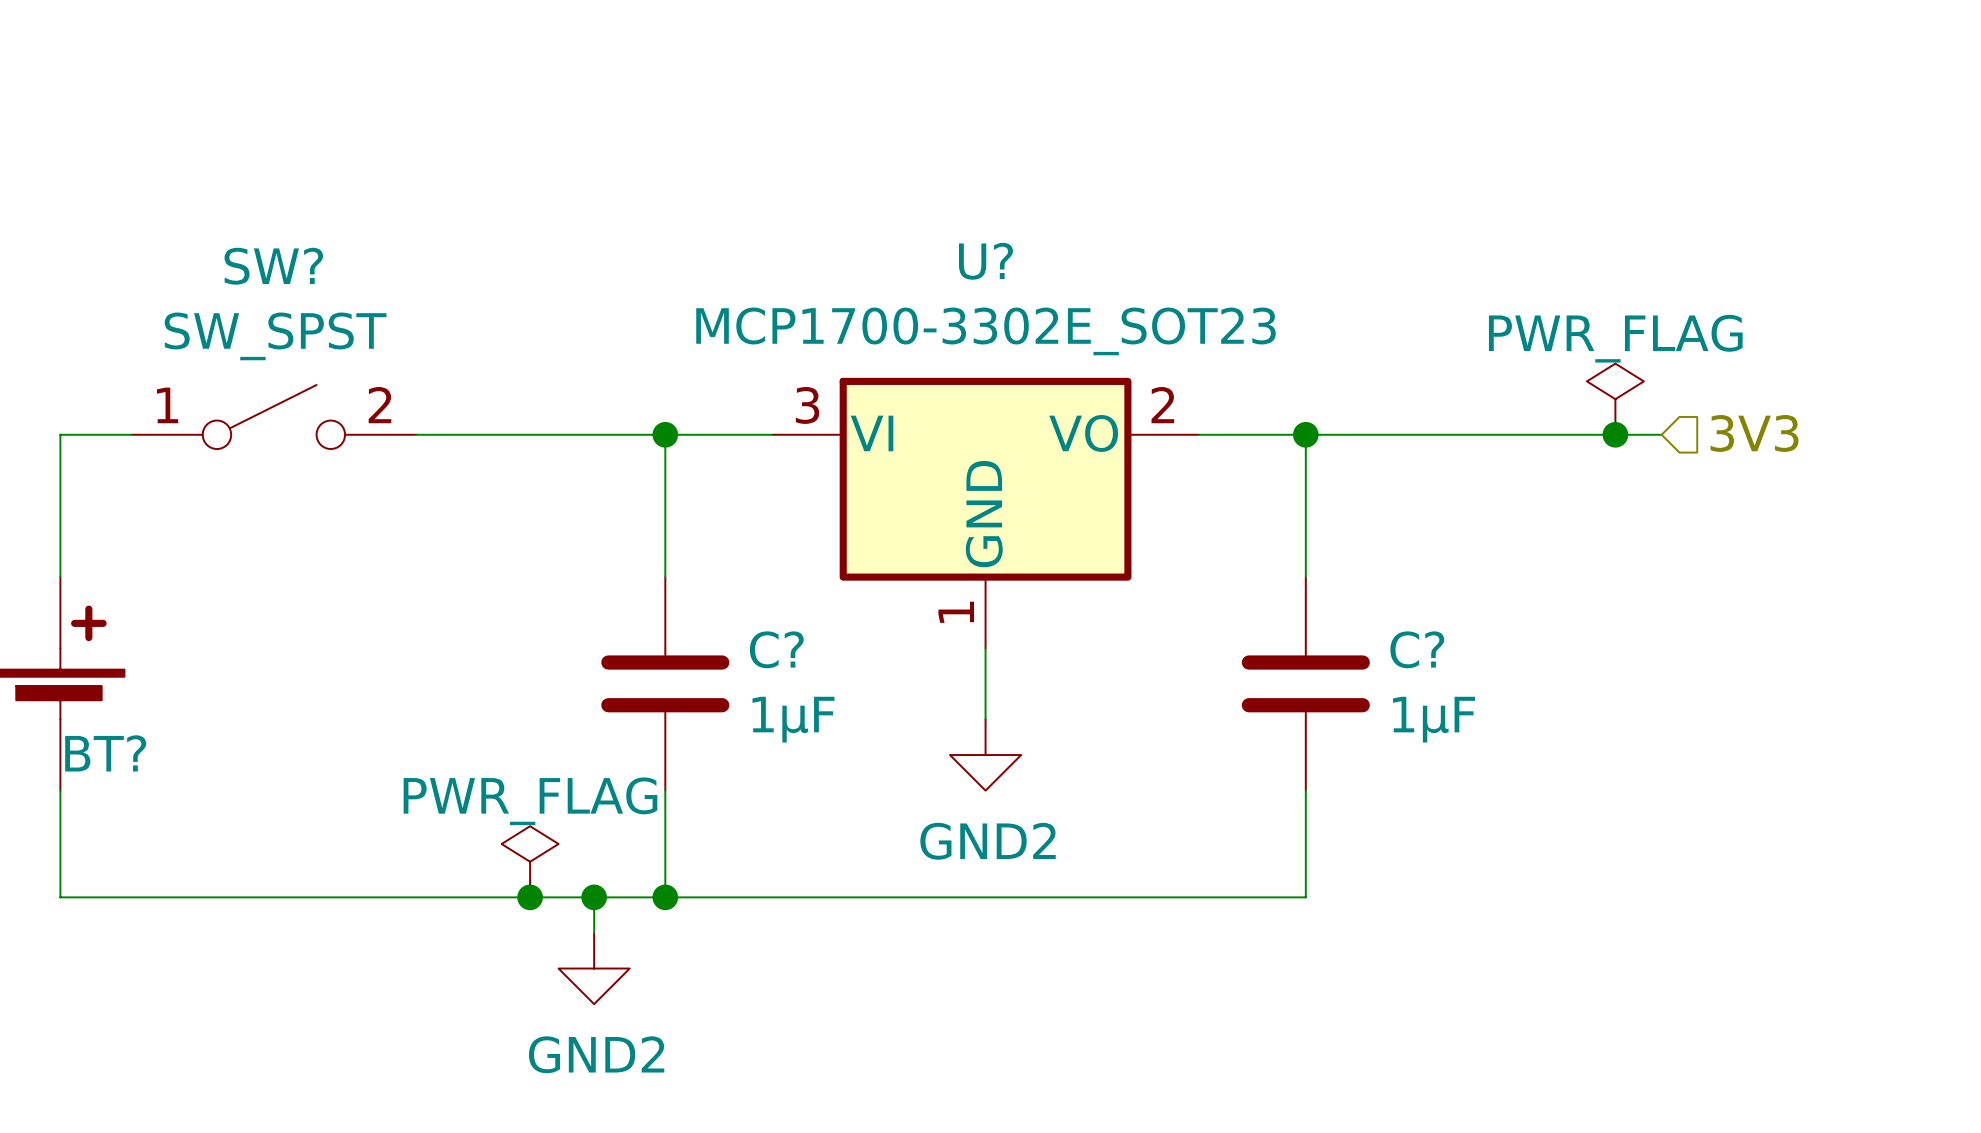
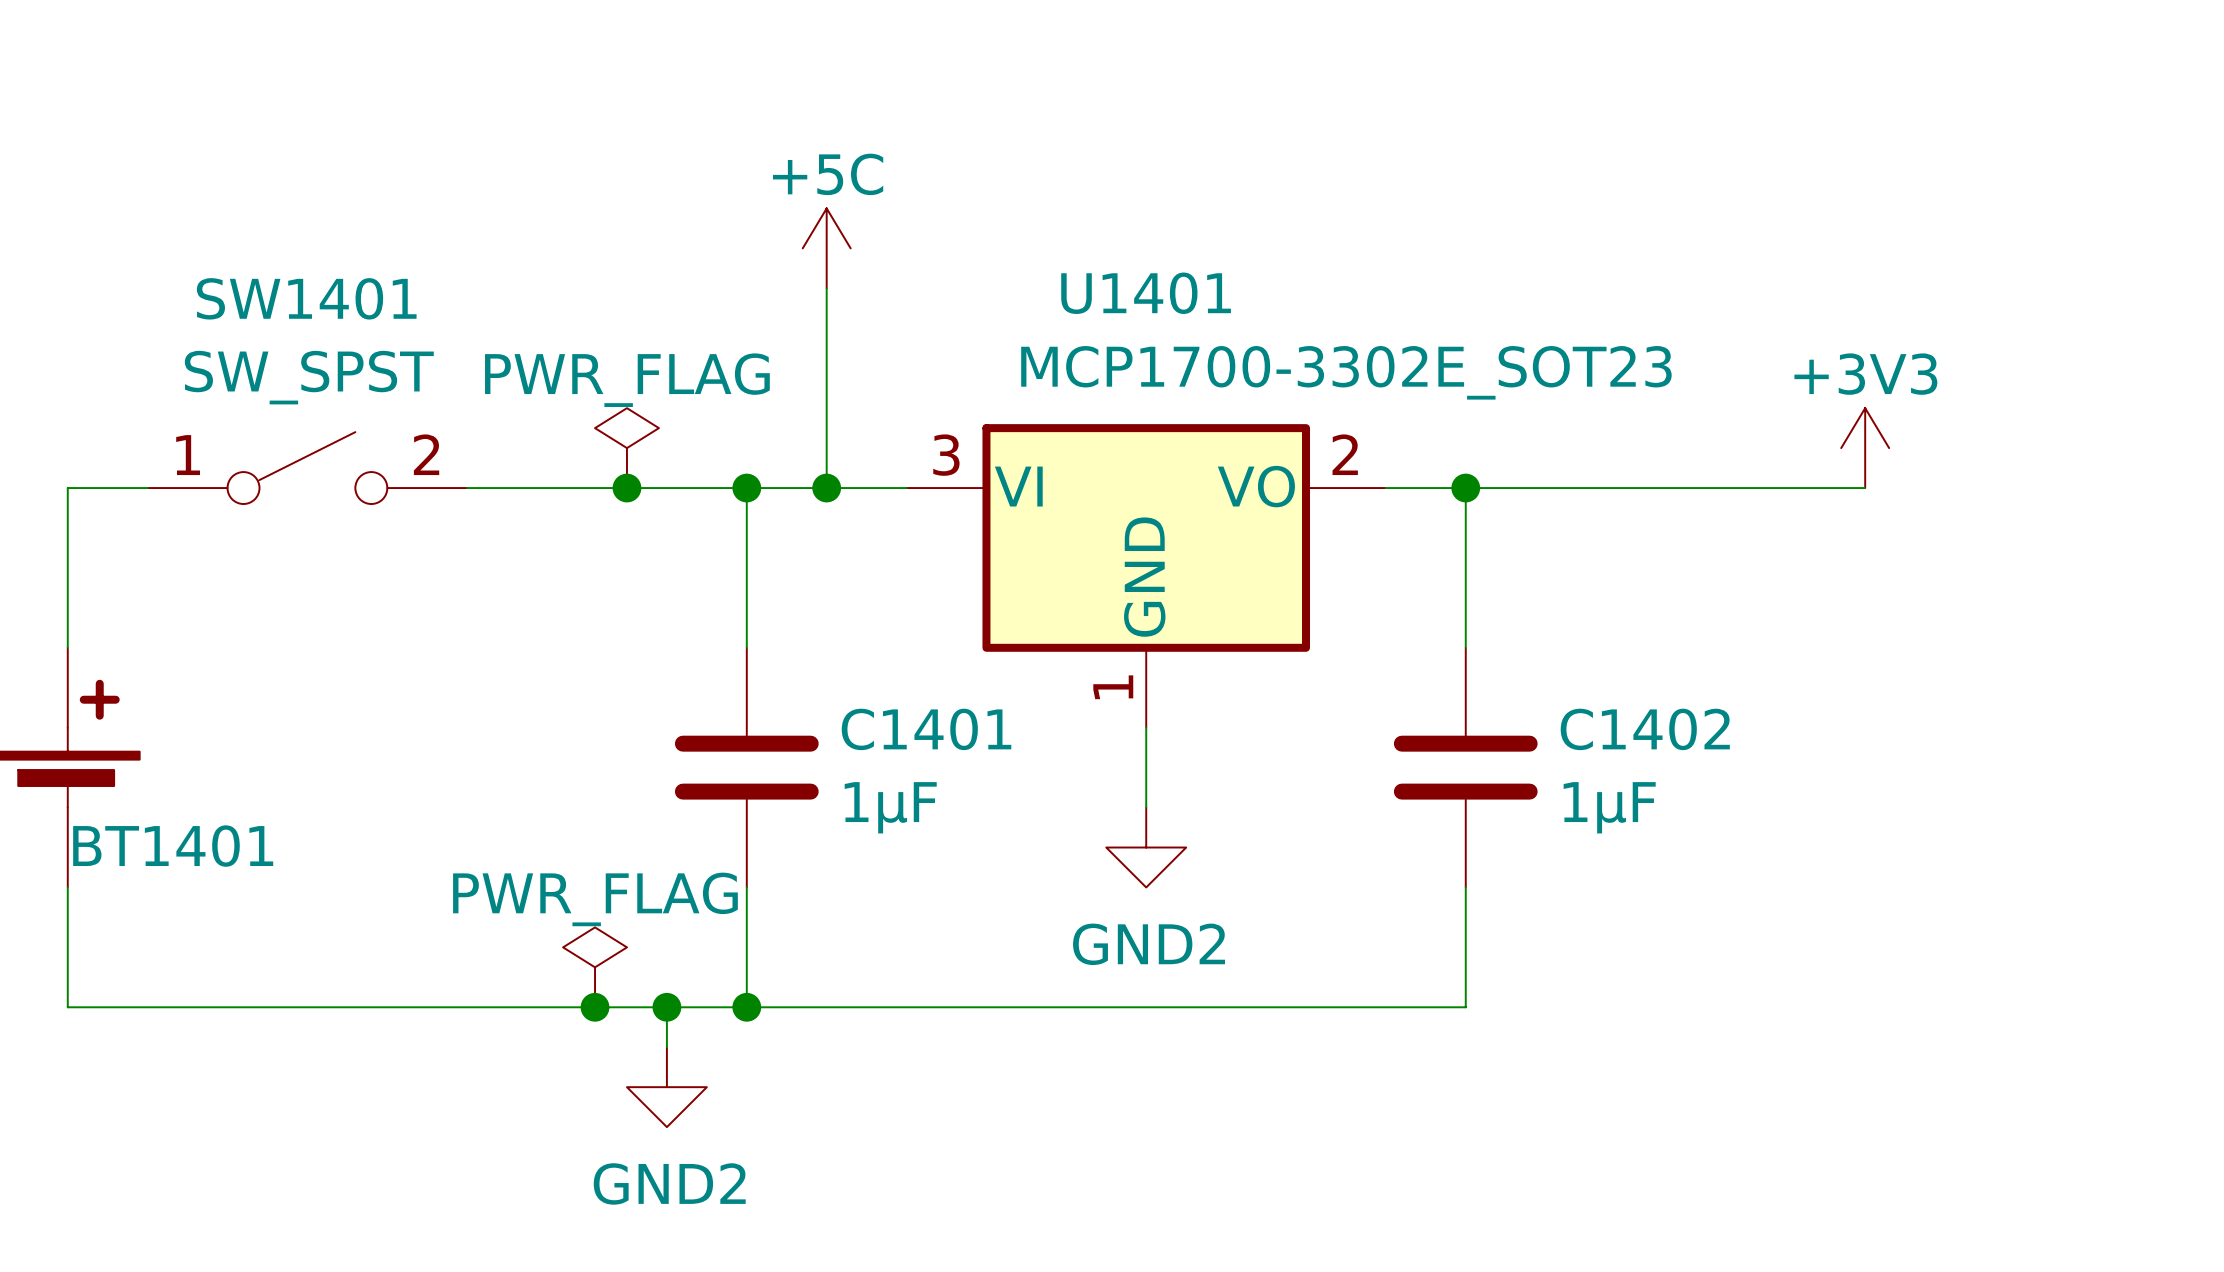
power symbol: none -> +5C (826, 248)
wire: none -> (826, 288) (826, 488)
SW? name: SW? (273, 266) -> SW1401 (306, 298)
power symbol: none -> PWR_FLAG (626, 448)
power symbol: PWR_FLAG (1615, 399) -> none
power symbol: none -> +3V3 (1865, 448)
hierarchical label: 3V3 (1754, 433) -> none
junction: none -> (626, 488)
junction: none -> (826, 488)
junction: (1615, 434) -> none
U?: MCP1700-3302E_SOT23 (985, 513) -> none
U1401: none -> MCP1700-3302E_SOT23 (1146, 575)
wire: (985, 648) (985, 719) -> (1146, 727) (1146, 807)
C? name: C? (776, 649) -> C1401 (926, 729)
C? name: C? (1417, 649) -> C1402 (1645, 729)
BT? name: BT? (105, 753) -> BT1401 (173, 846)
power symbol position: GND2 (985, 755) -> GND2 (1146, 847)

